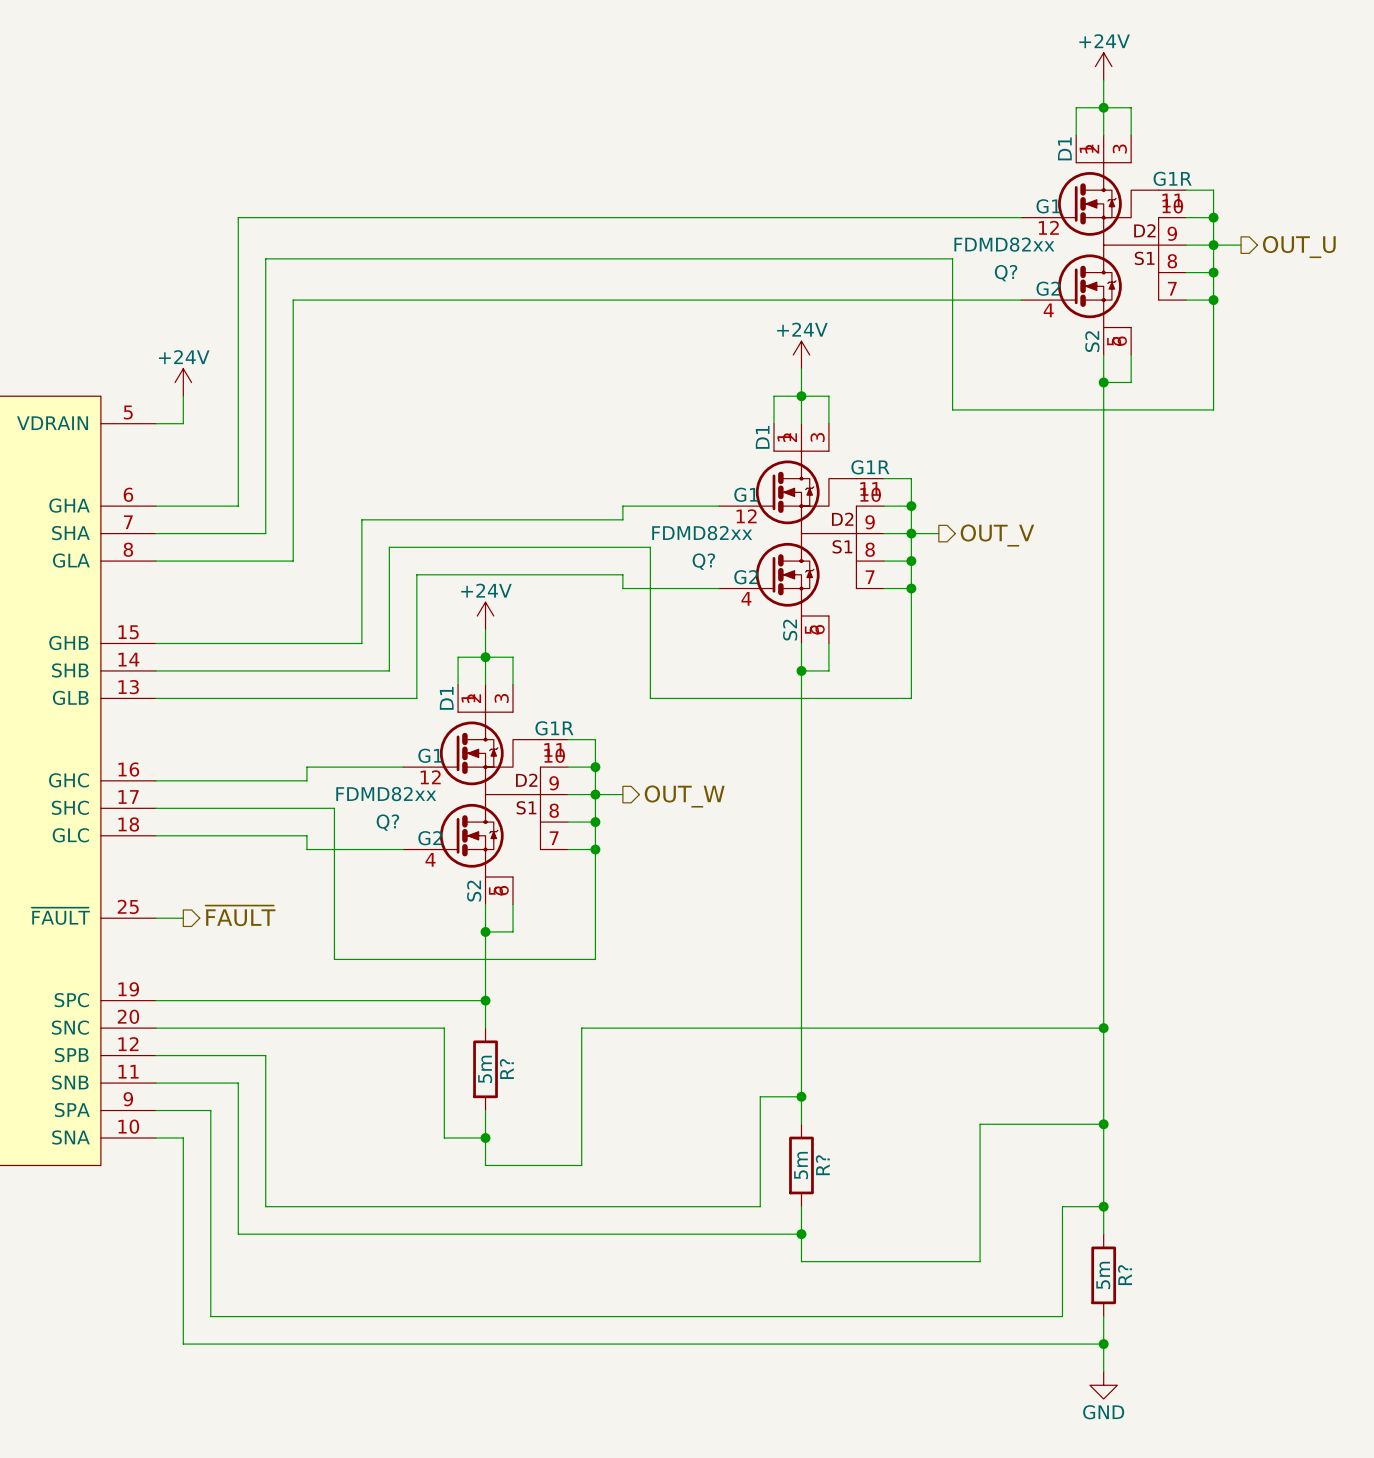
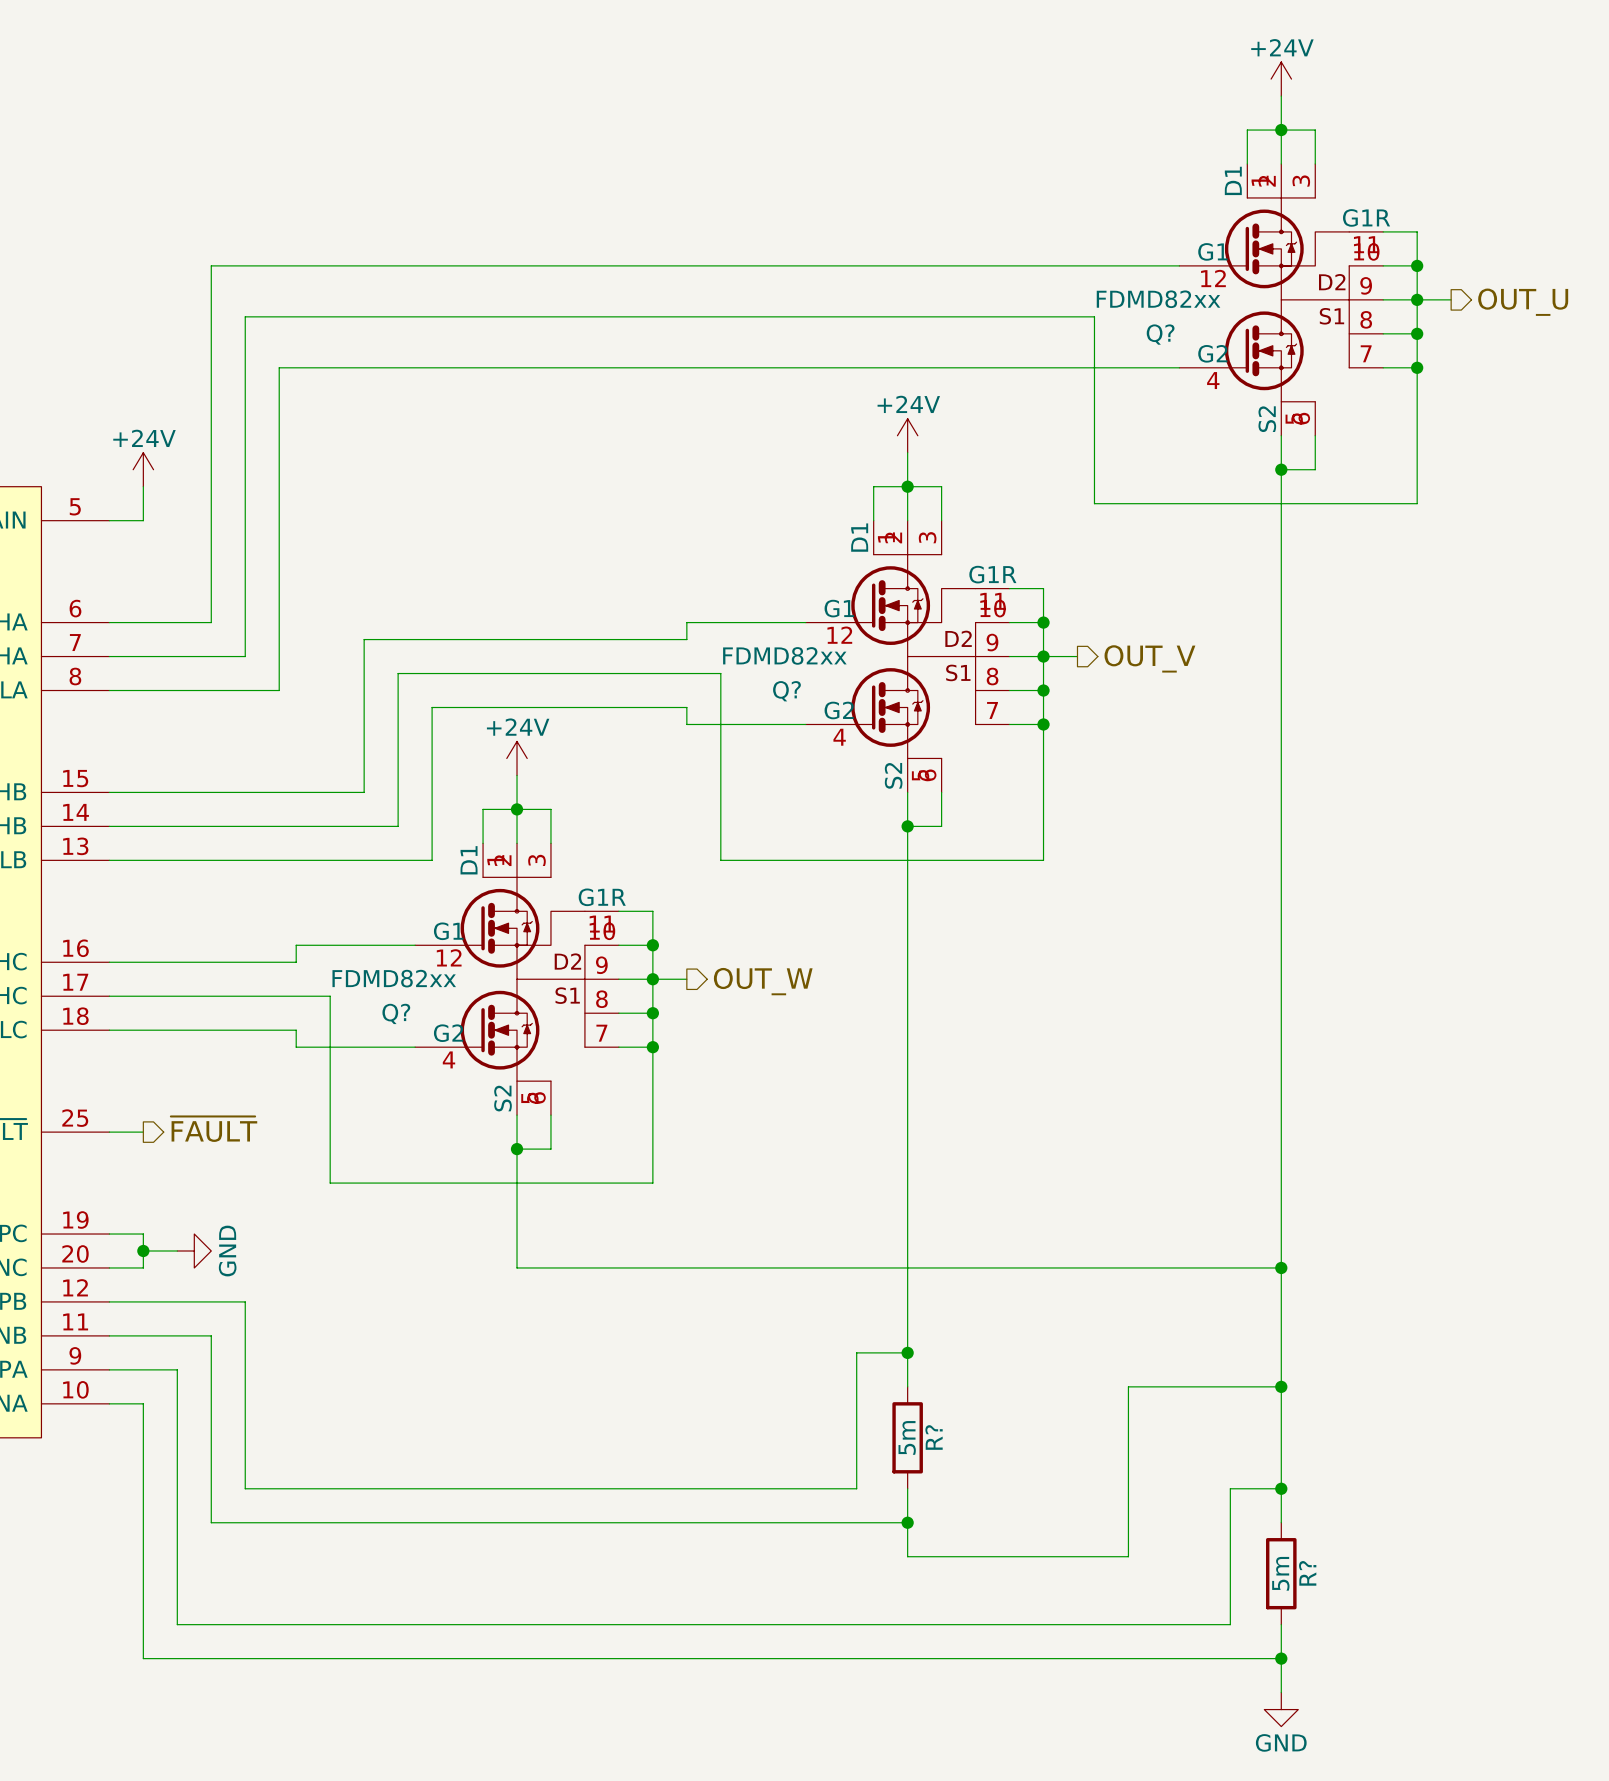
wire: (183, 1000) (485, 1000) -> (143, 1234) (143, 1267)
junction: (485, 1000) -> none
wire: none -> (143, 1250) (177, 1250)
junction: none -> (143, 1250)
power symbol: none -> GND (194, 1250)
wire: (183, 1028) (444, 1028) (444, 1138) (485, 1138) -> none
wire: (581, 1028) (581, 1165) (485, 1165) (485, 1110) -> (635, 1267) (517, 1267)
R?: 5m (485, 1069) -> none
junction: (485, 1138) -> none

